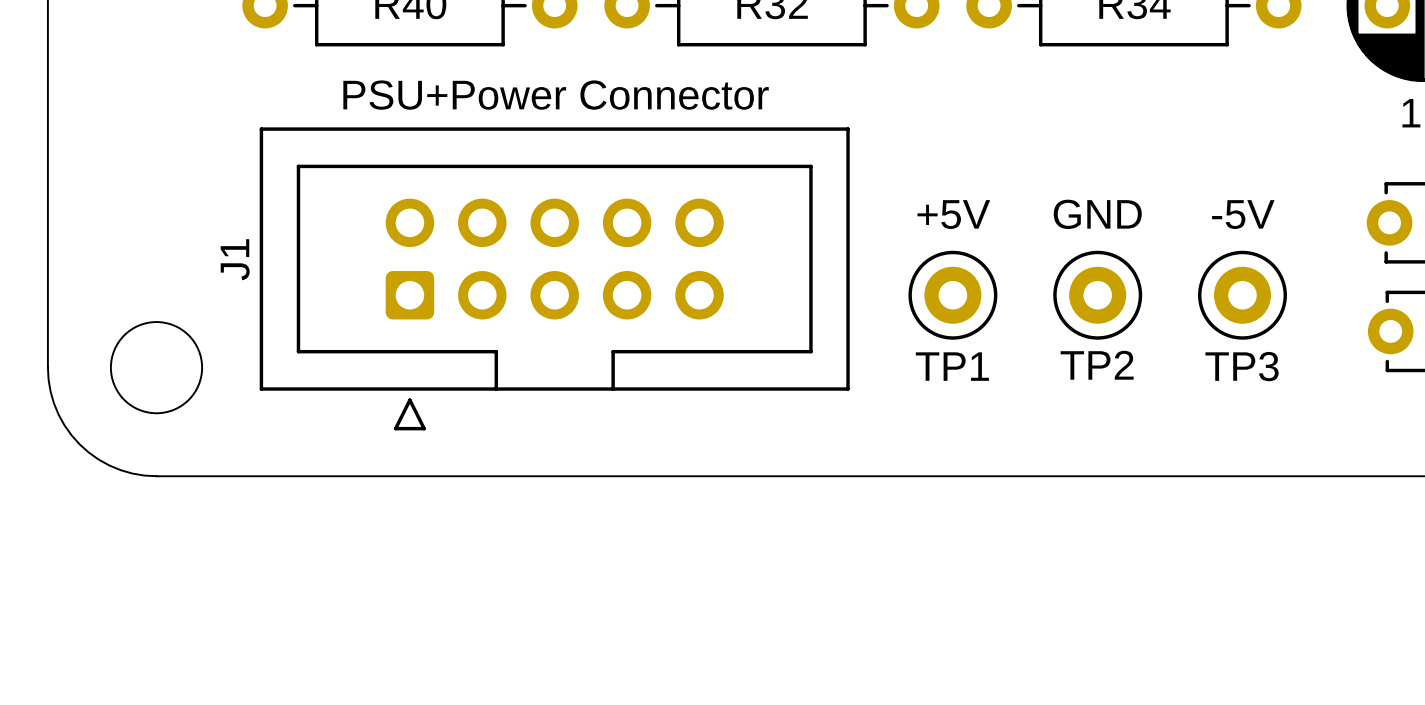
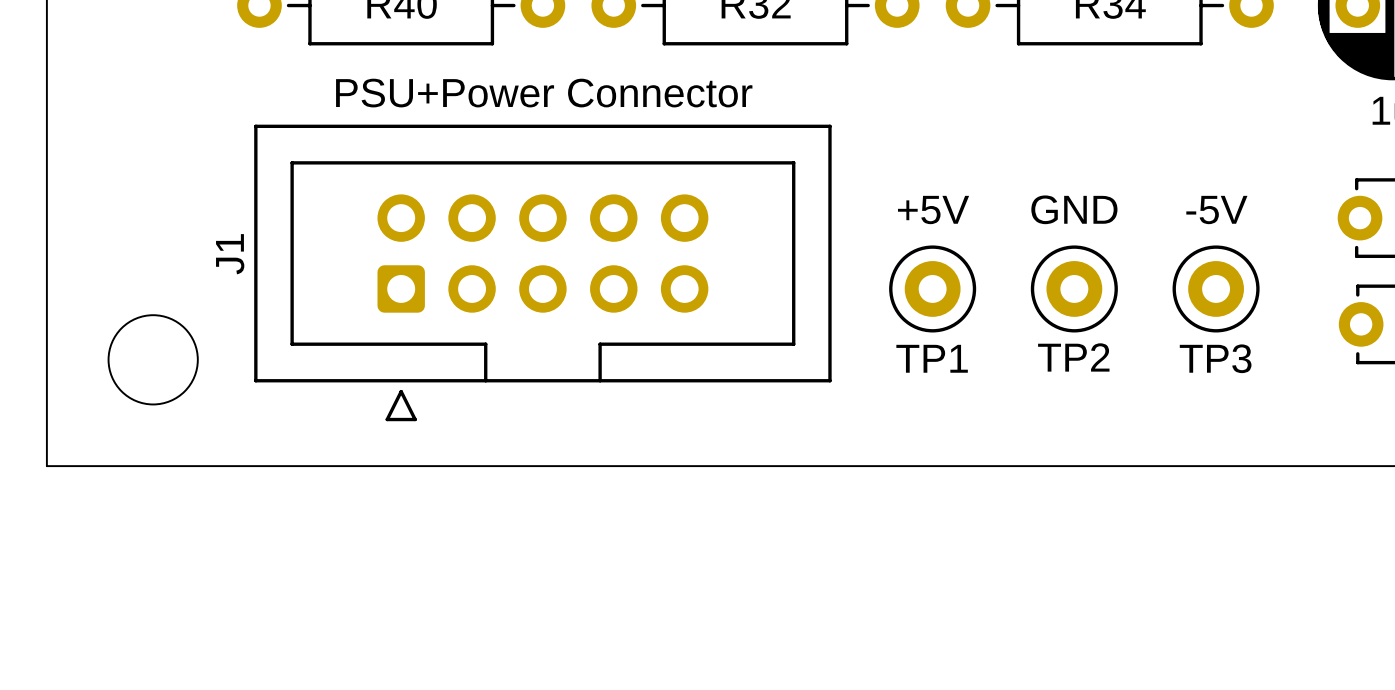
board edge: (47, 367) (50, 391) (58, 414) (79, 444) (109, 465) (132, 473) (156, 476) -> (46, 359) (46, 466) (153, 466)

